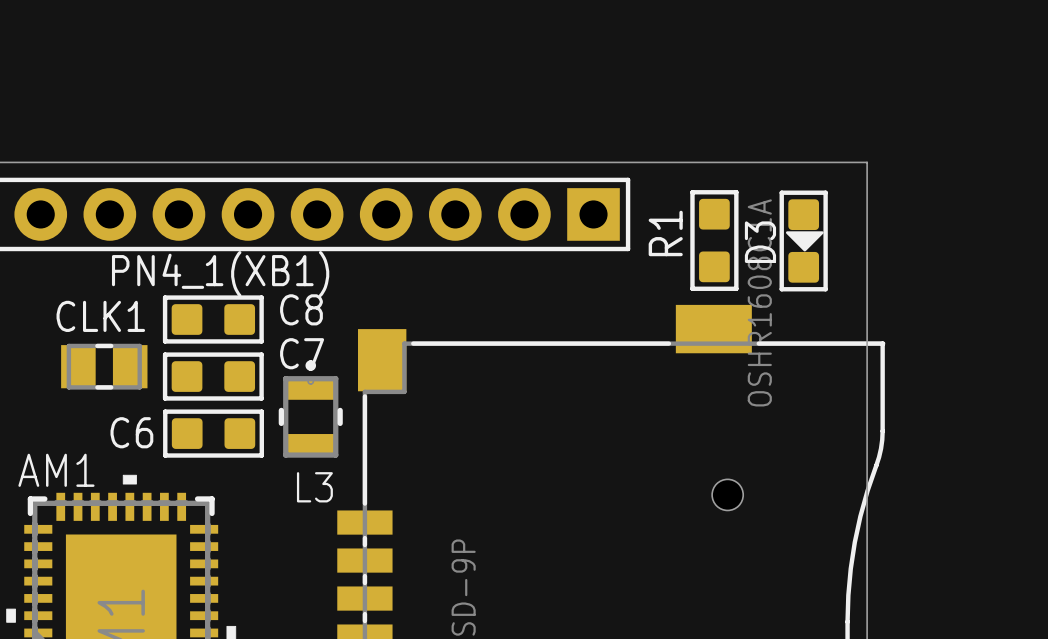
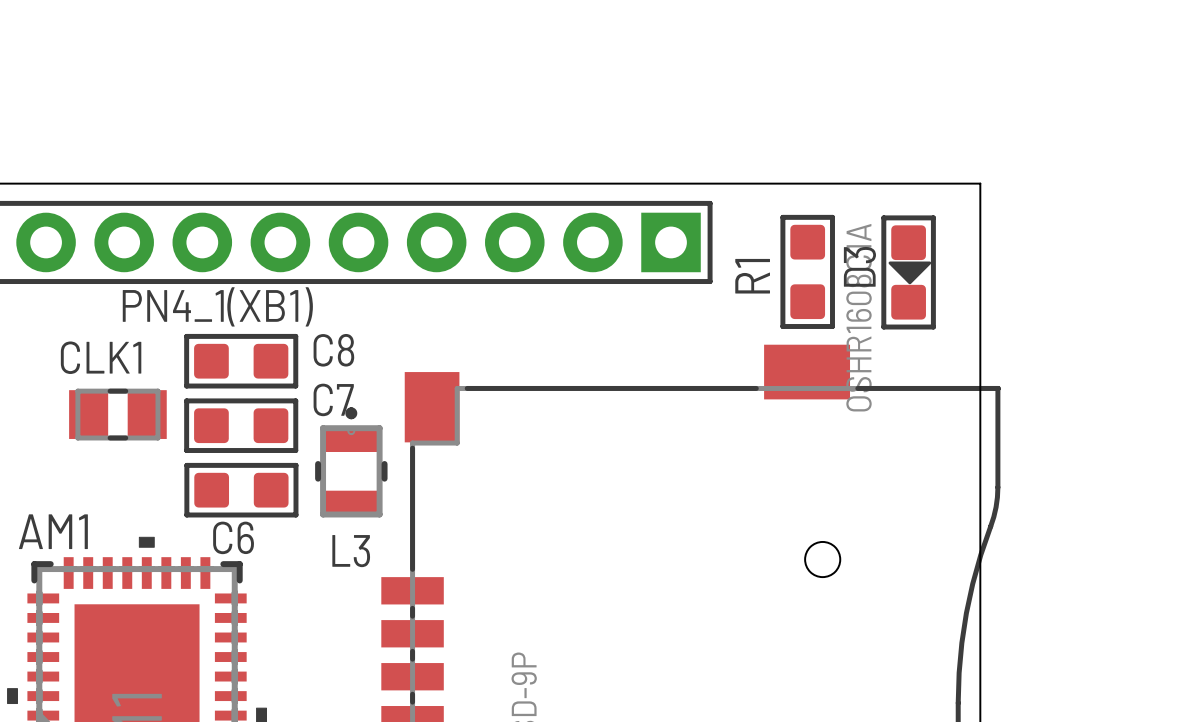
C6 name position: C6 (131, 432) -> C6 (233, 537)

